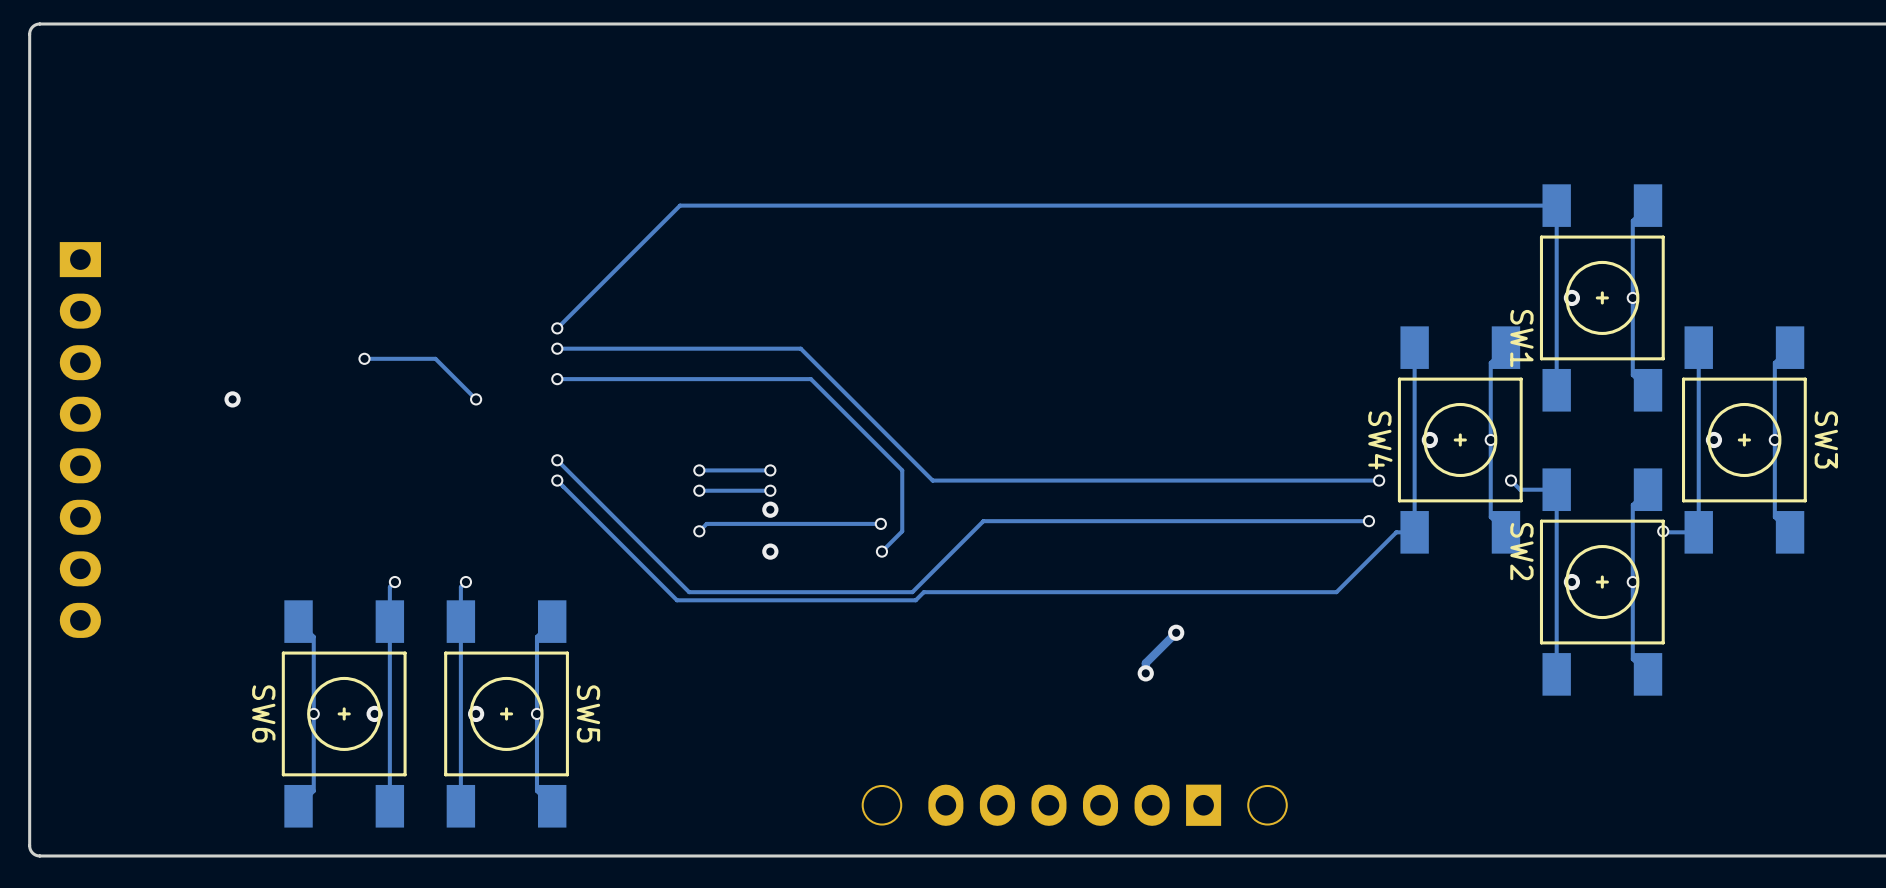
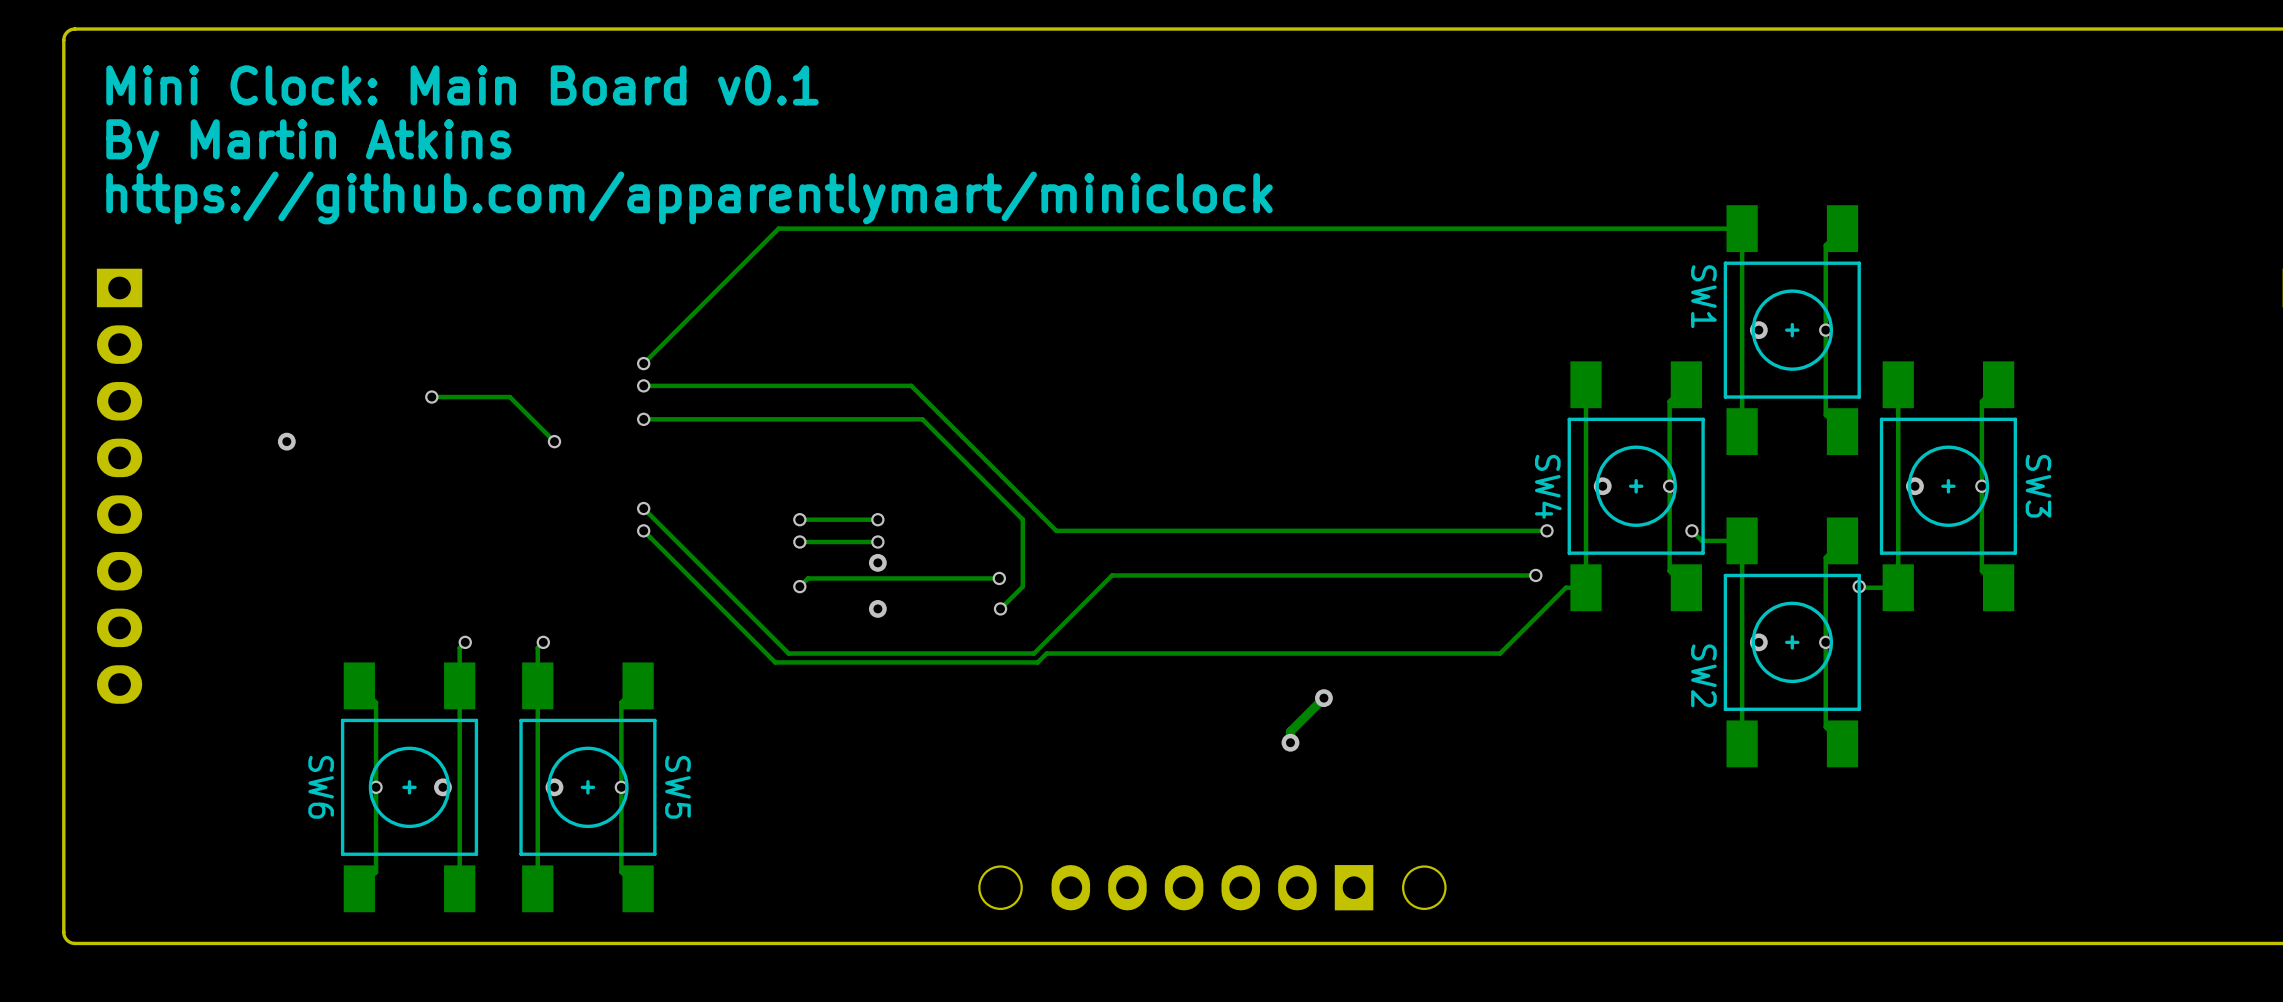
text: none -> Mini Clock: Main Board v0.1 (462, 85)
text: none -> By Martin Atkins (308, 144)
text: none -> https://github.com/apparentlymart/miniclock (689, 197)
SW1 name position: SW1 (1521, 338) -> SW1 (1703, 296)
SW2 name position: SW2 (1521, 551) -> SW2 (1703, 675)

